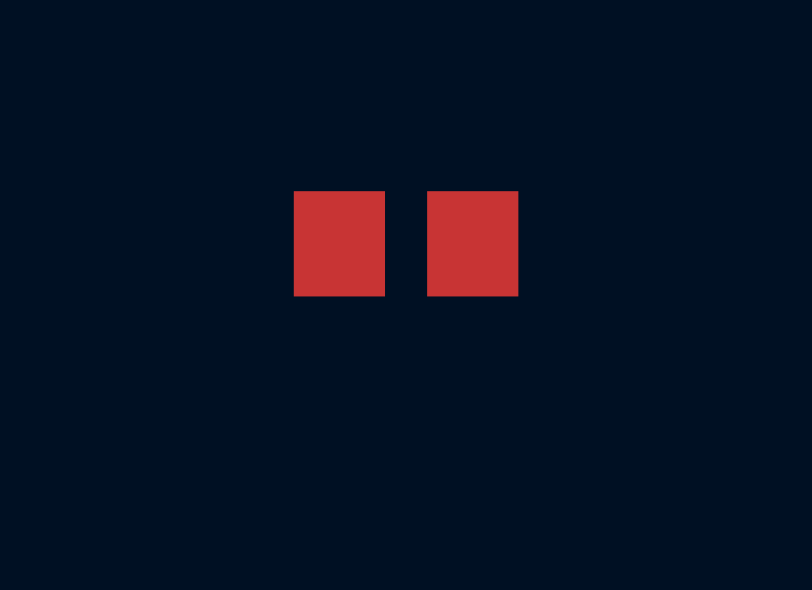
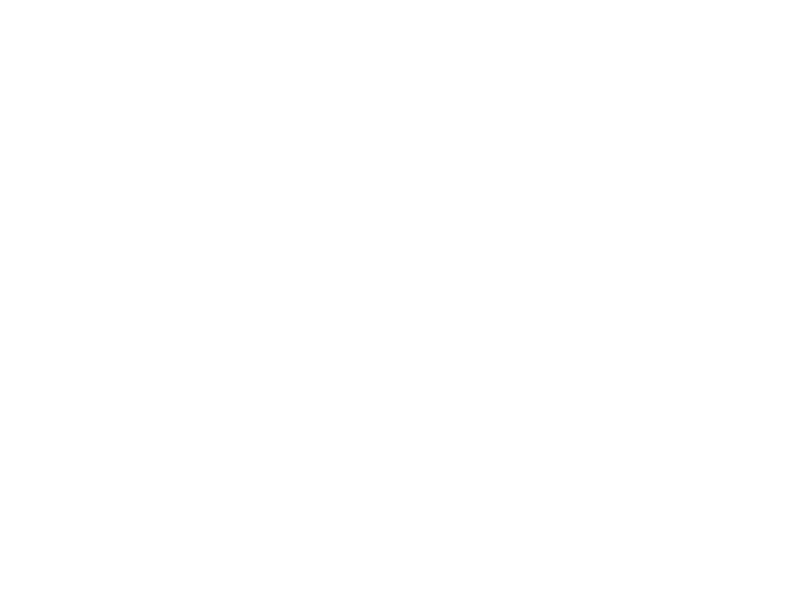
part: (406, 243) -> none

